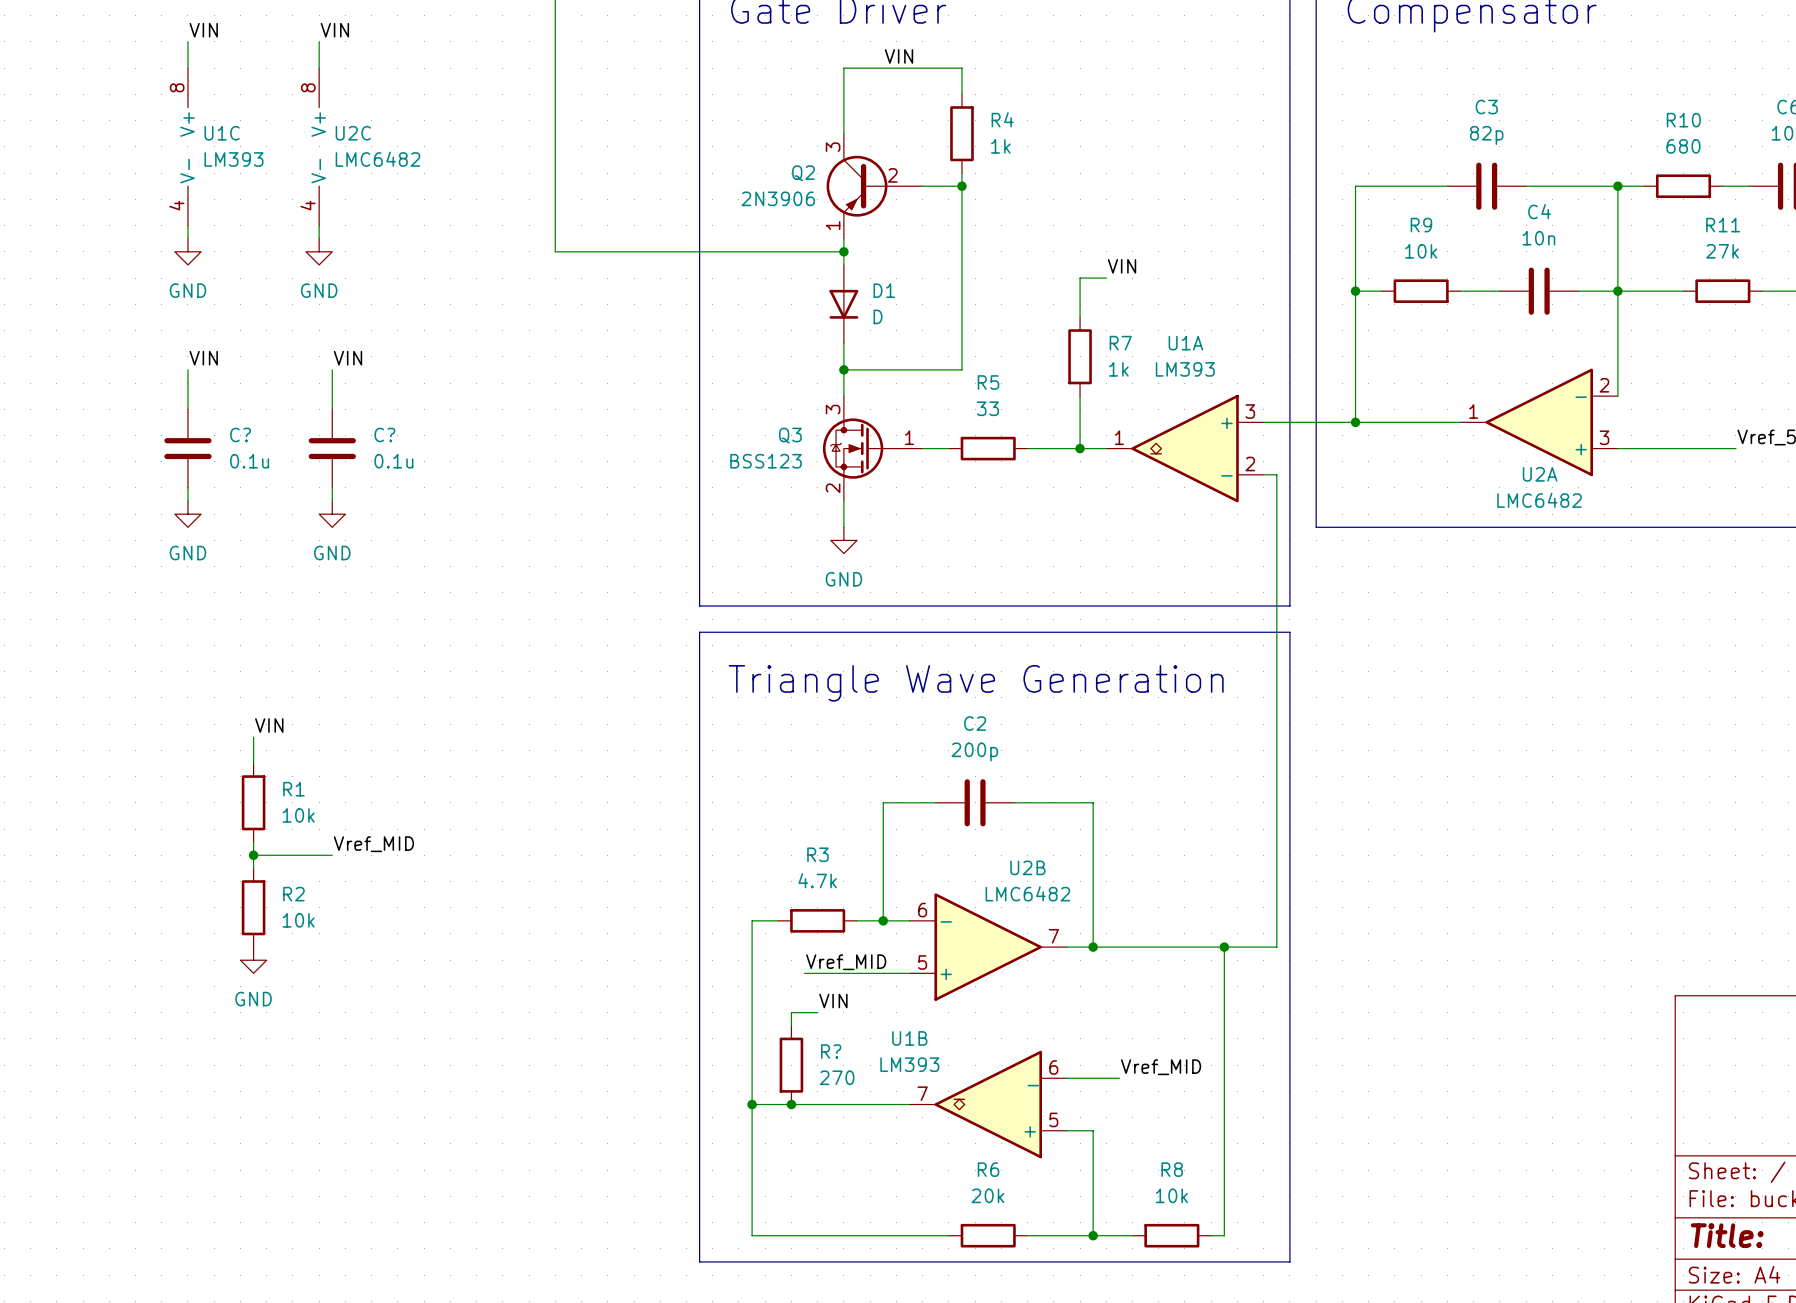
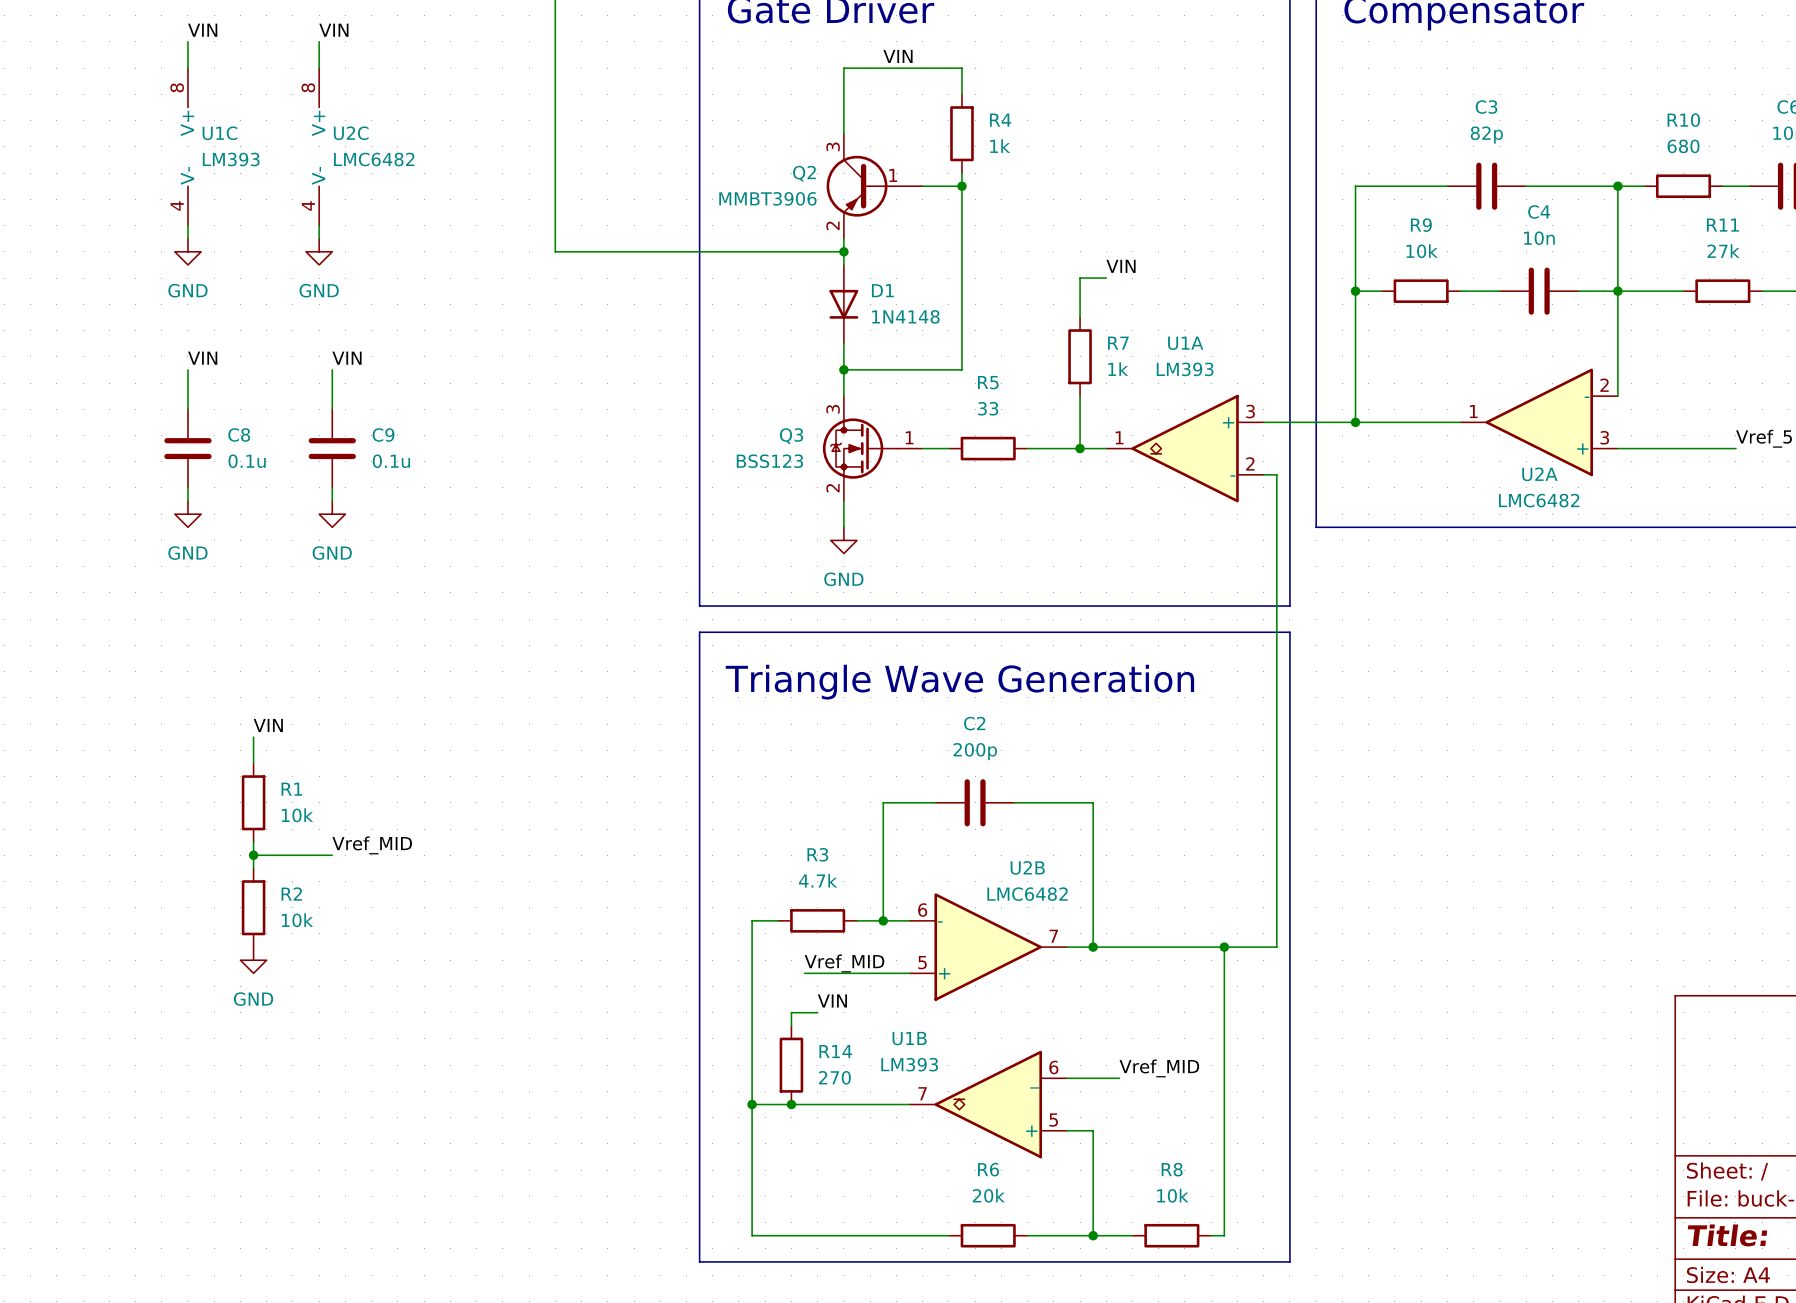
Q2 pin number: 2 (892, 175) -> 1 (893, 175)
Q2 value: 2N3906 (778, 198) -> MMBT3906 (767, 198)
Q2 pin number: 1 (833, 225) -> 2 (832, 225)
D1 value: D (878, 316) -> 1N4148 (905, 316)
C? name: C? (240, 434) -> C8 (239, 434)
C? name: C? (384, 434) -> C9 (383, 434)
R? name: R? (831, 1051) -> R14 (835, 1051)

